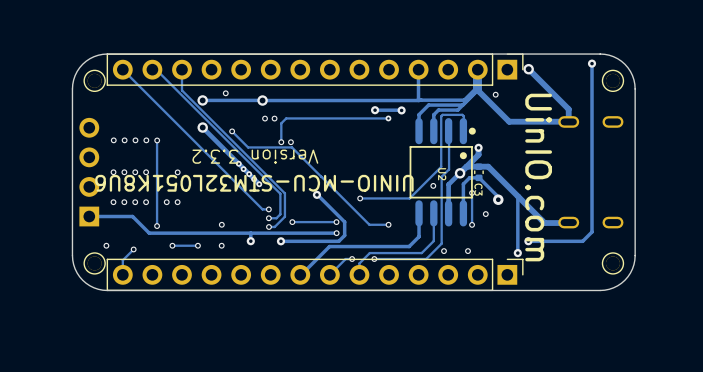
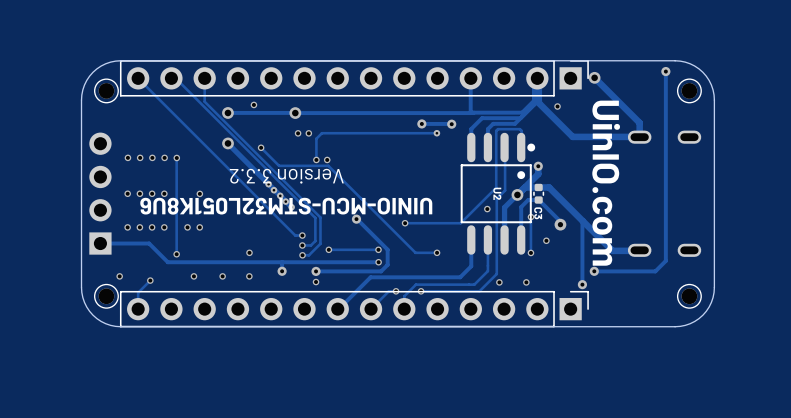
track: (197, 245) (172, 245) -> none
via: none -> (316, 282)

